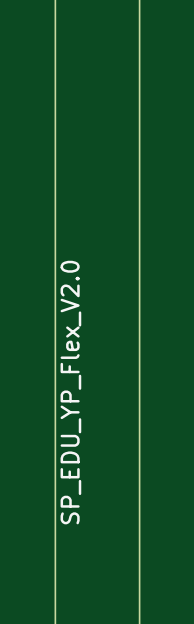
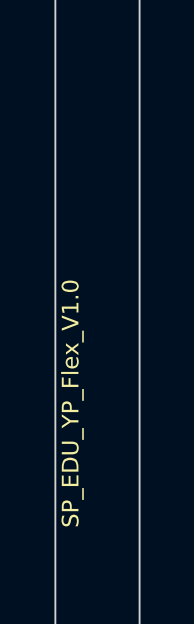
text: SP_EDU_YP_Flex_V2.0 (70, 392) -> SP_EDU_YP_Flex_V1.0 (72, 403)

